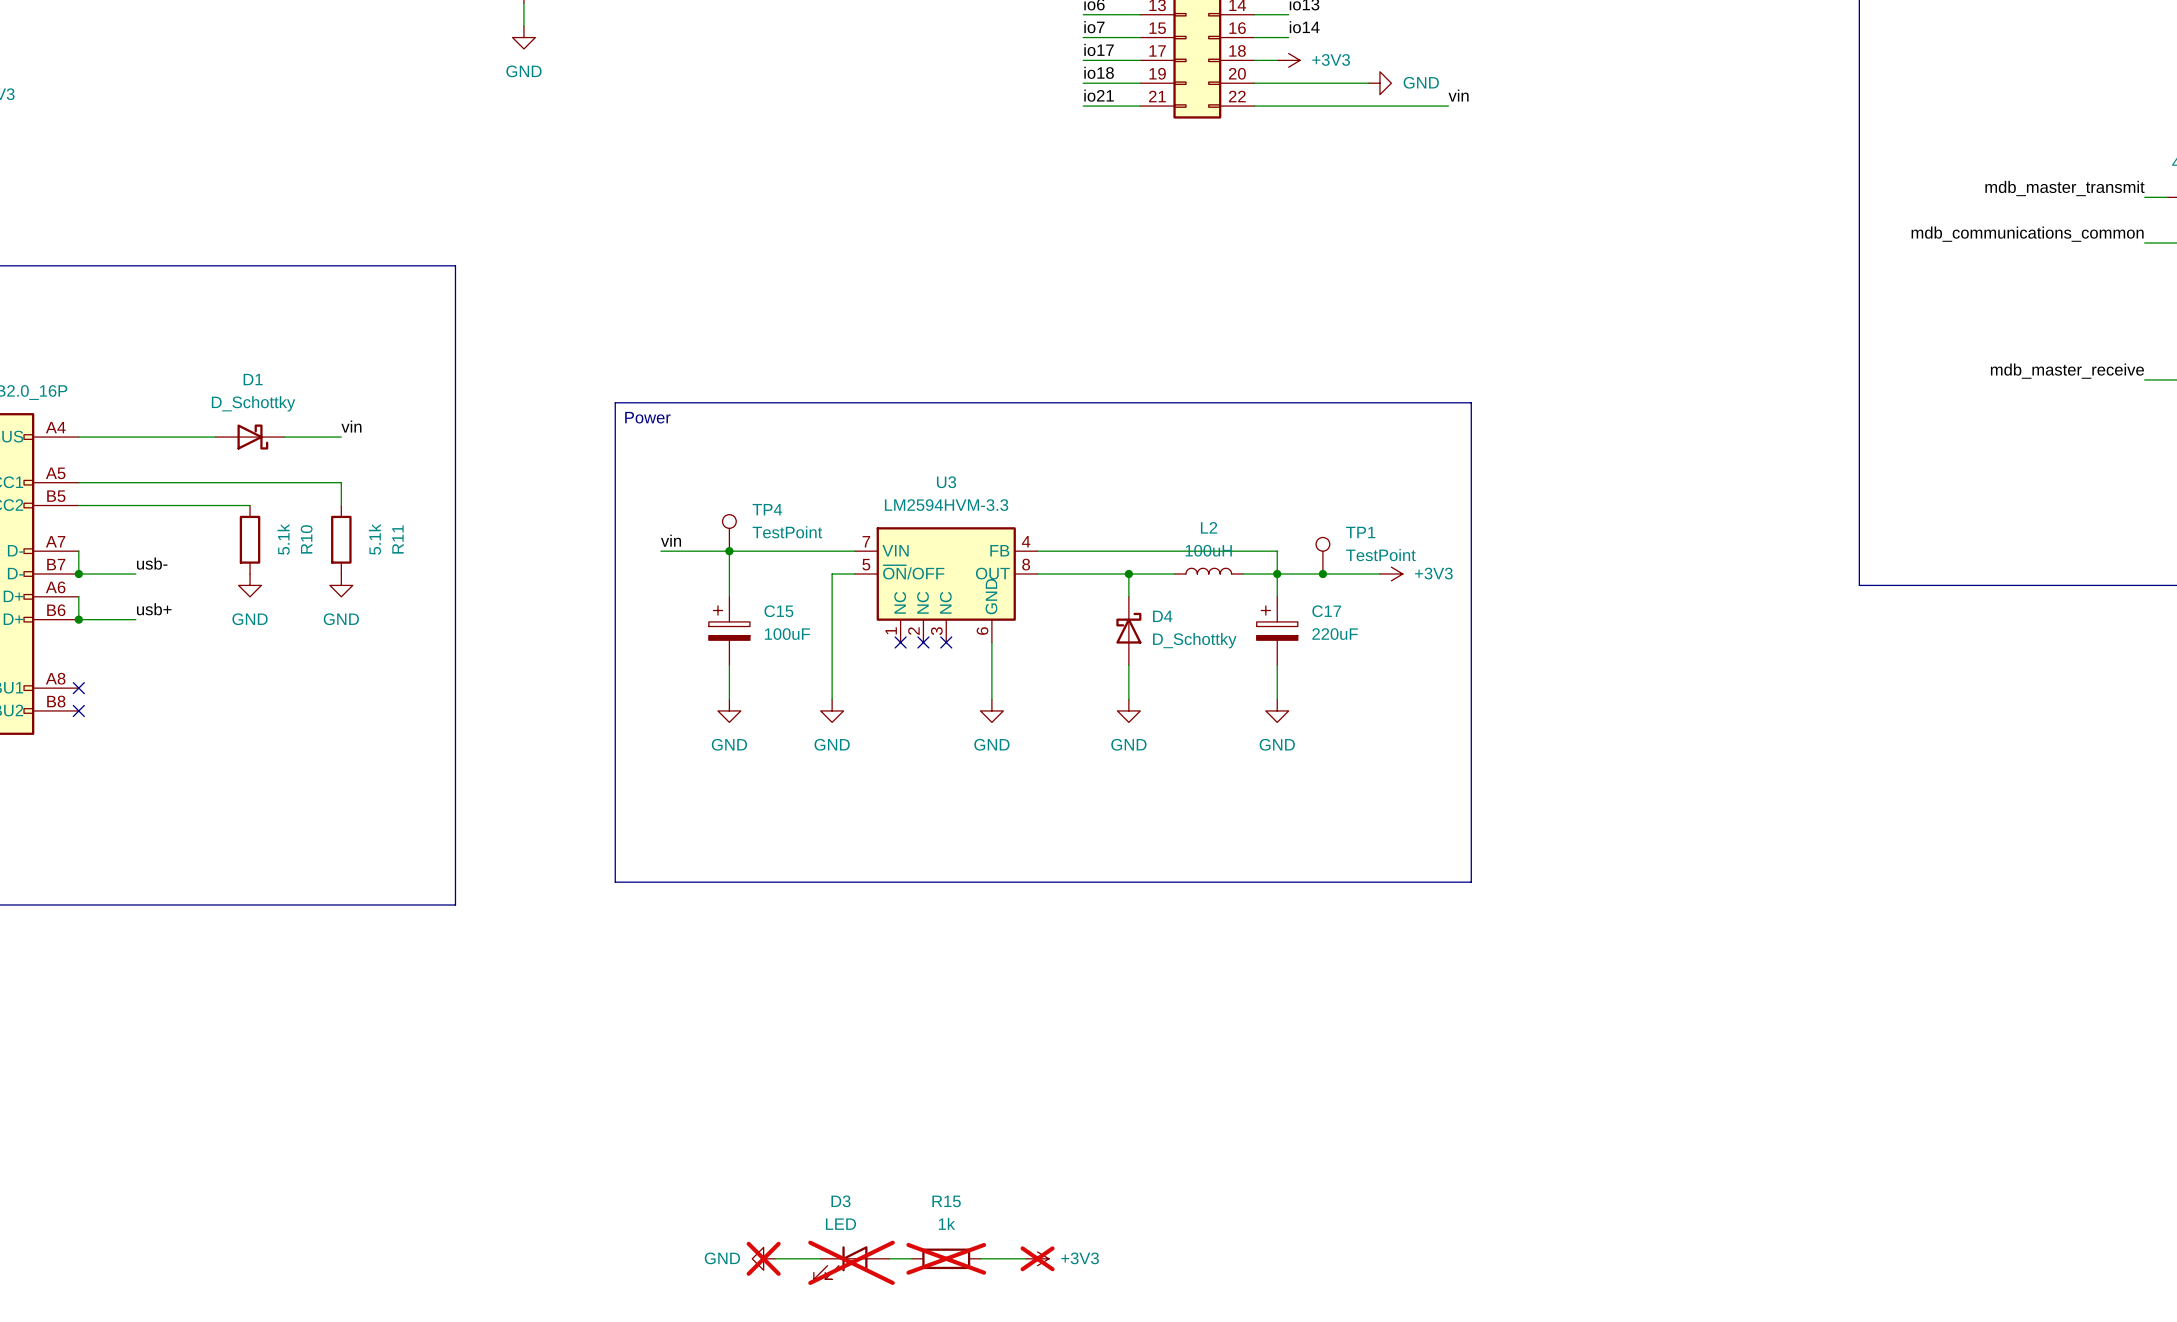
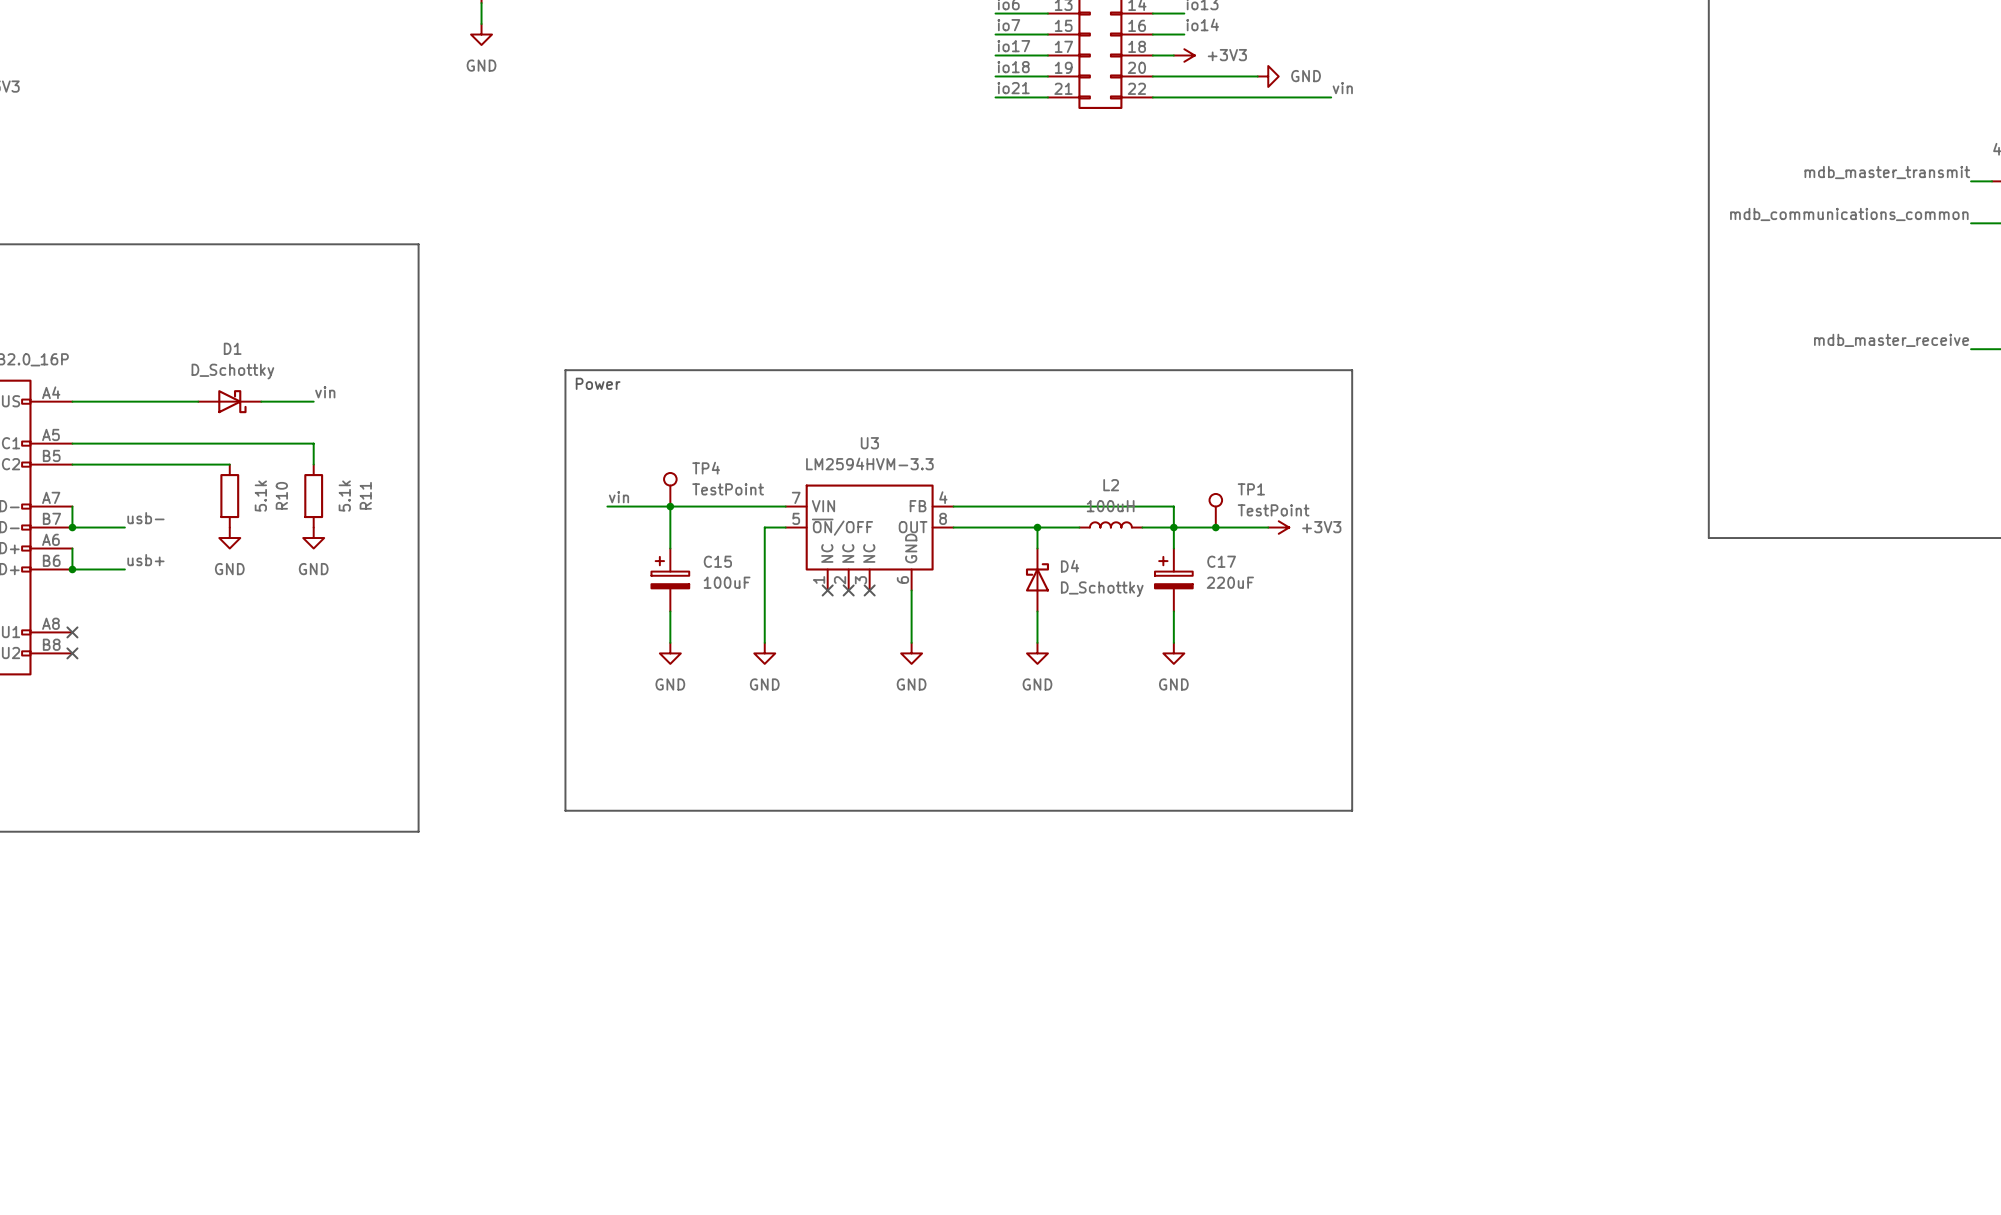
power symbol: GND (763, 1258) -> none
wire: (775, 1258) (820, 1258) -> none
wire: (889, 1258) (912, 1258) -> none
R15: 1k (946, 1258) -> none
wire: (980, 1258) (1026, 1258) -> none
power symbol: +3V3 (1037, 1258) -> none
D3: LED (851, 1262) -> none

